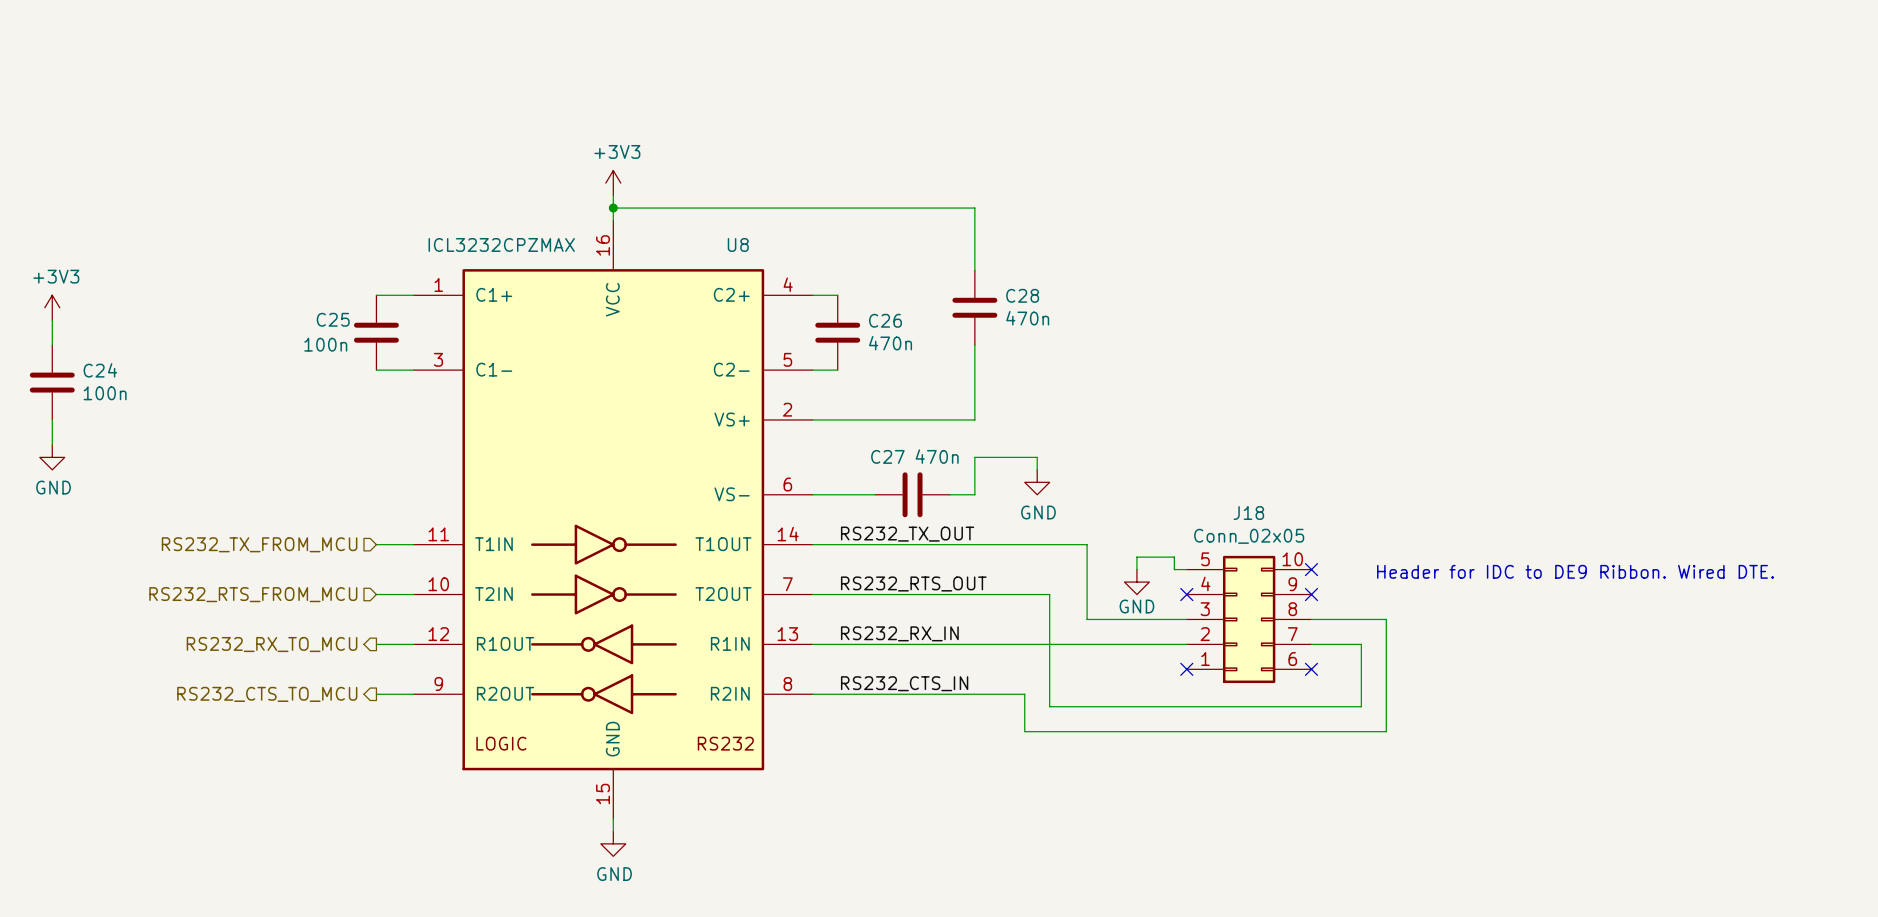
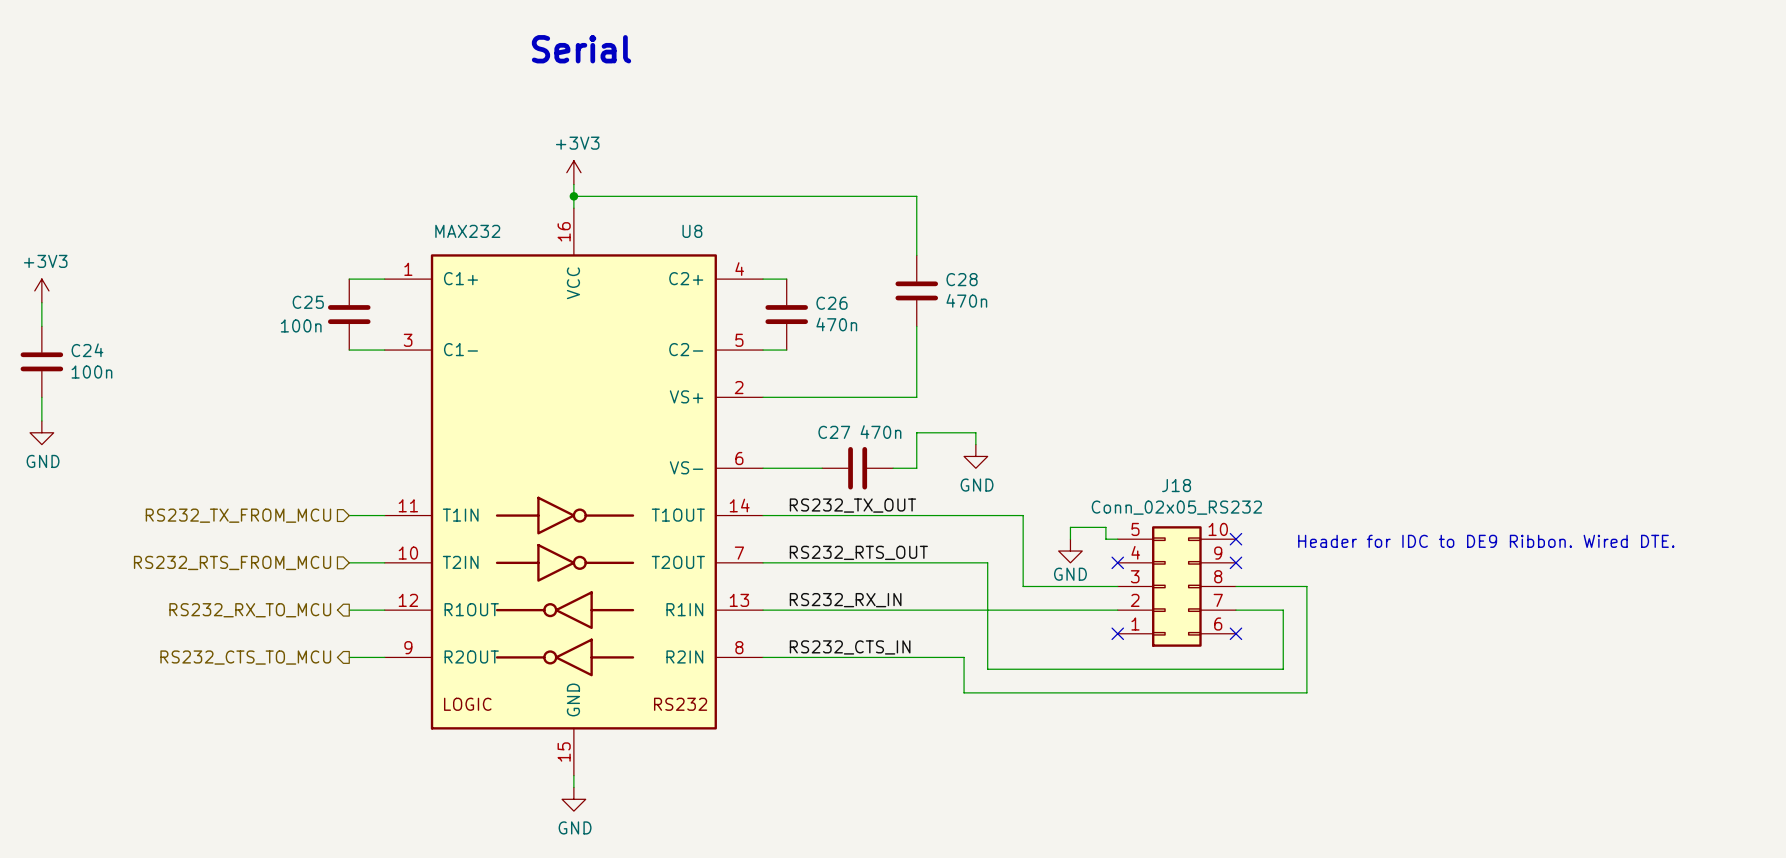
text: none -> Serial (581, 49)
U8 value: ICL3232CPZMAX (501, 244) -> MAX232 (467, 231)
J18 value: Conn_02x05 (1249, 536) -> Conn_02x05_RS232 (1176, 507)

